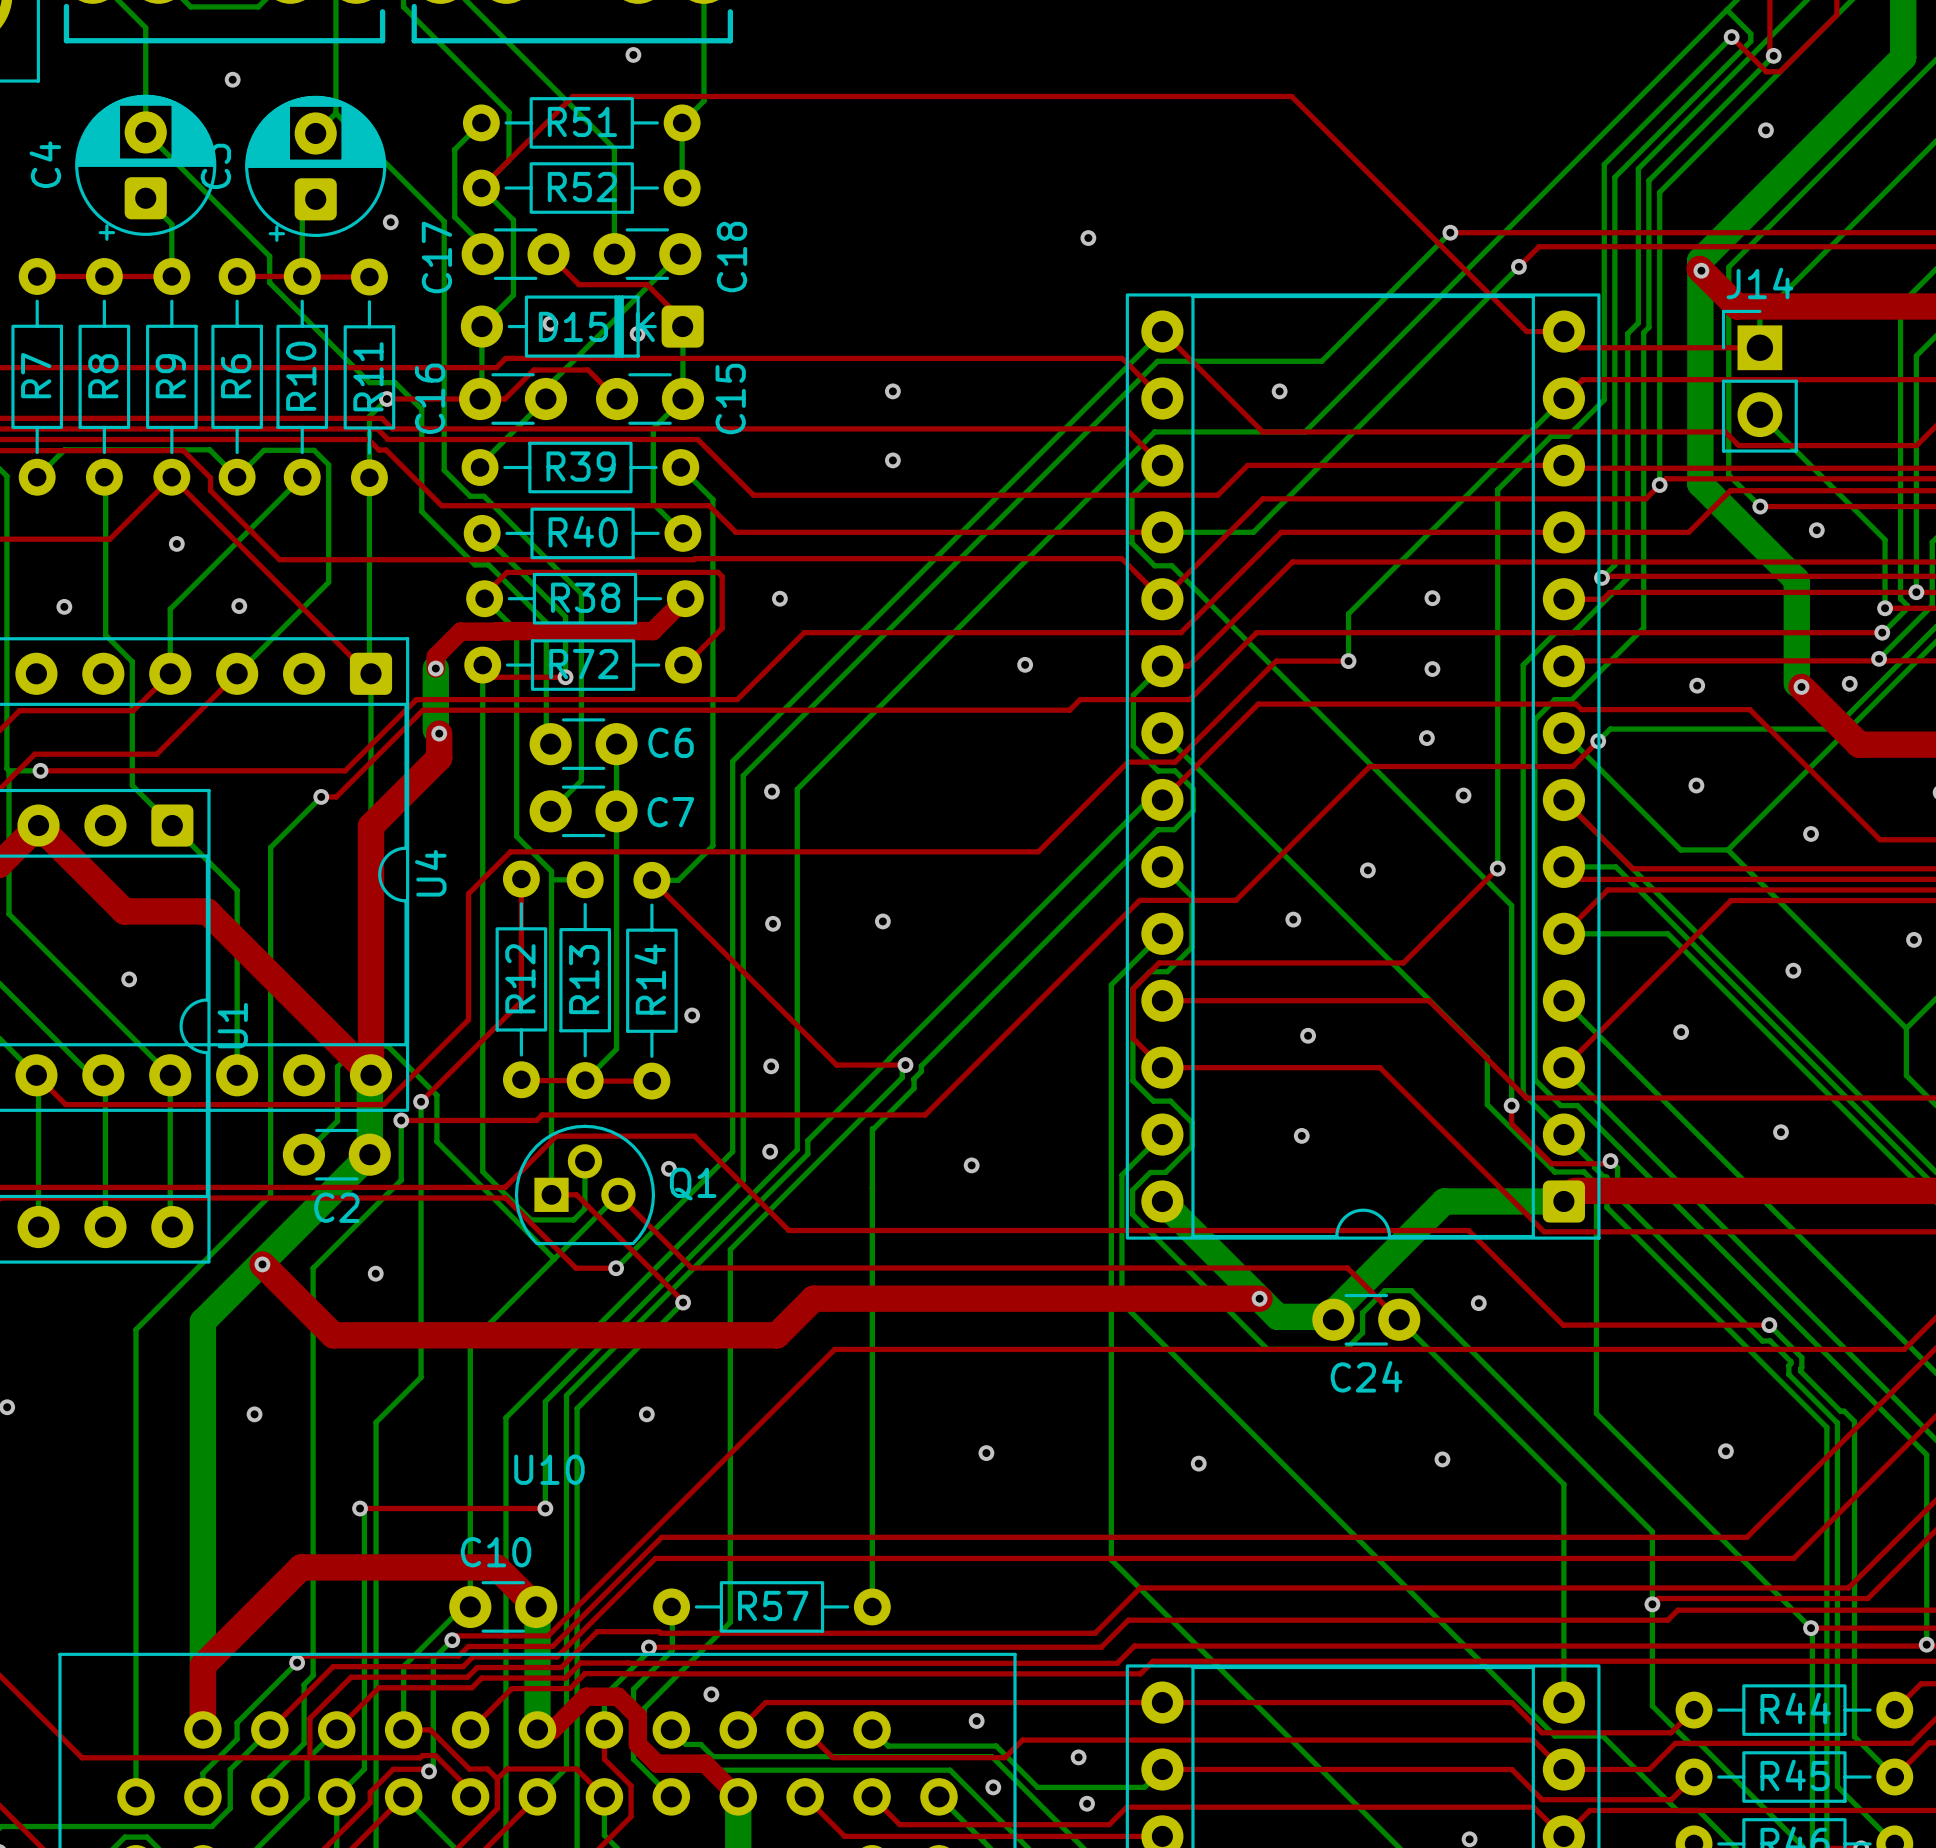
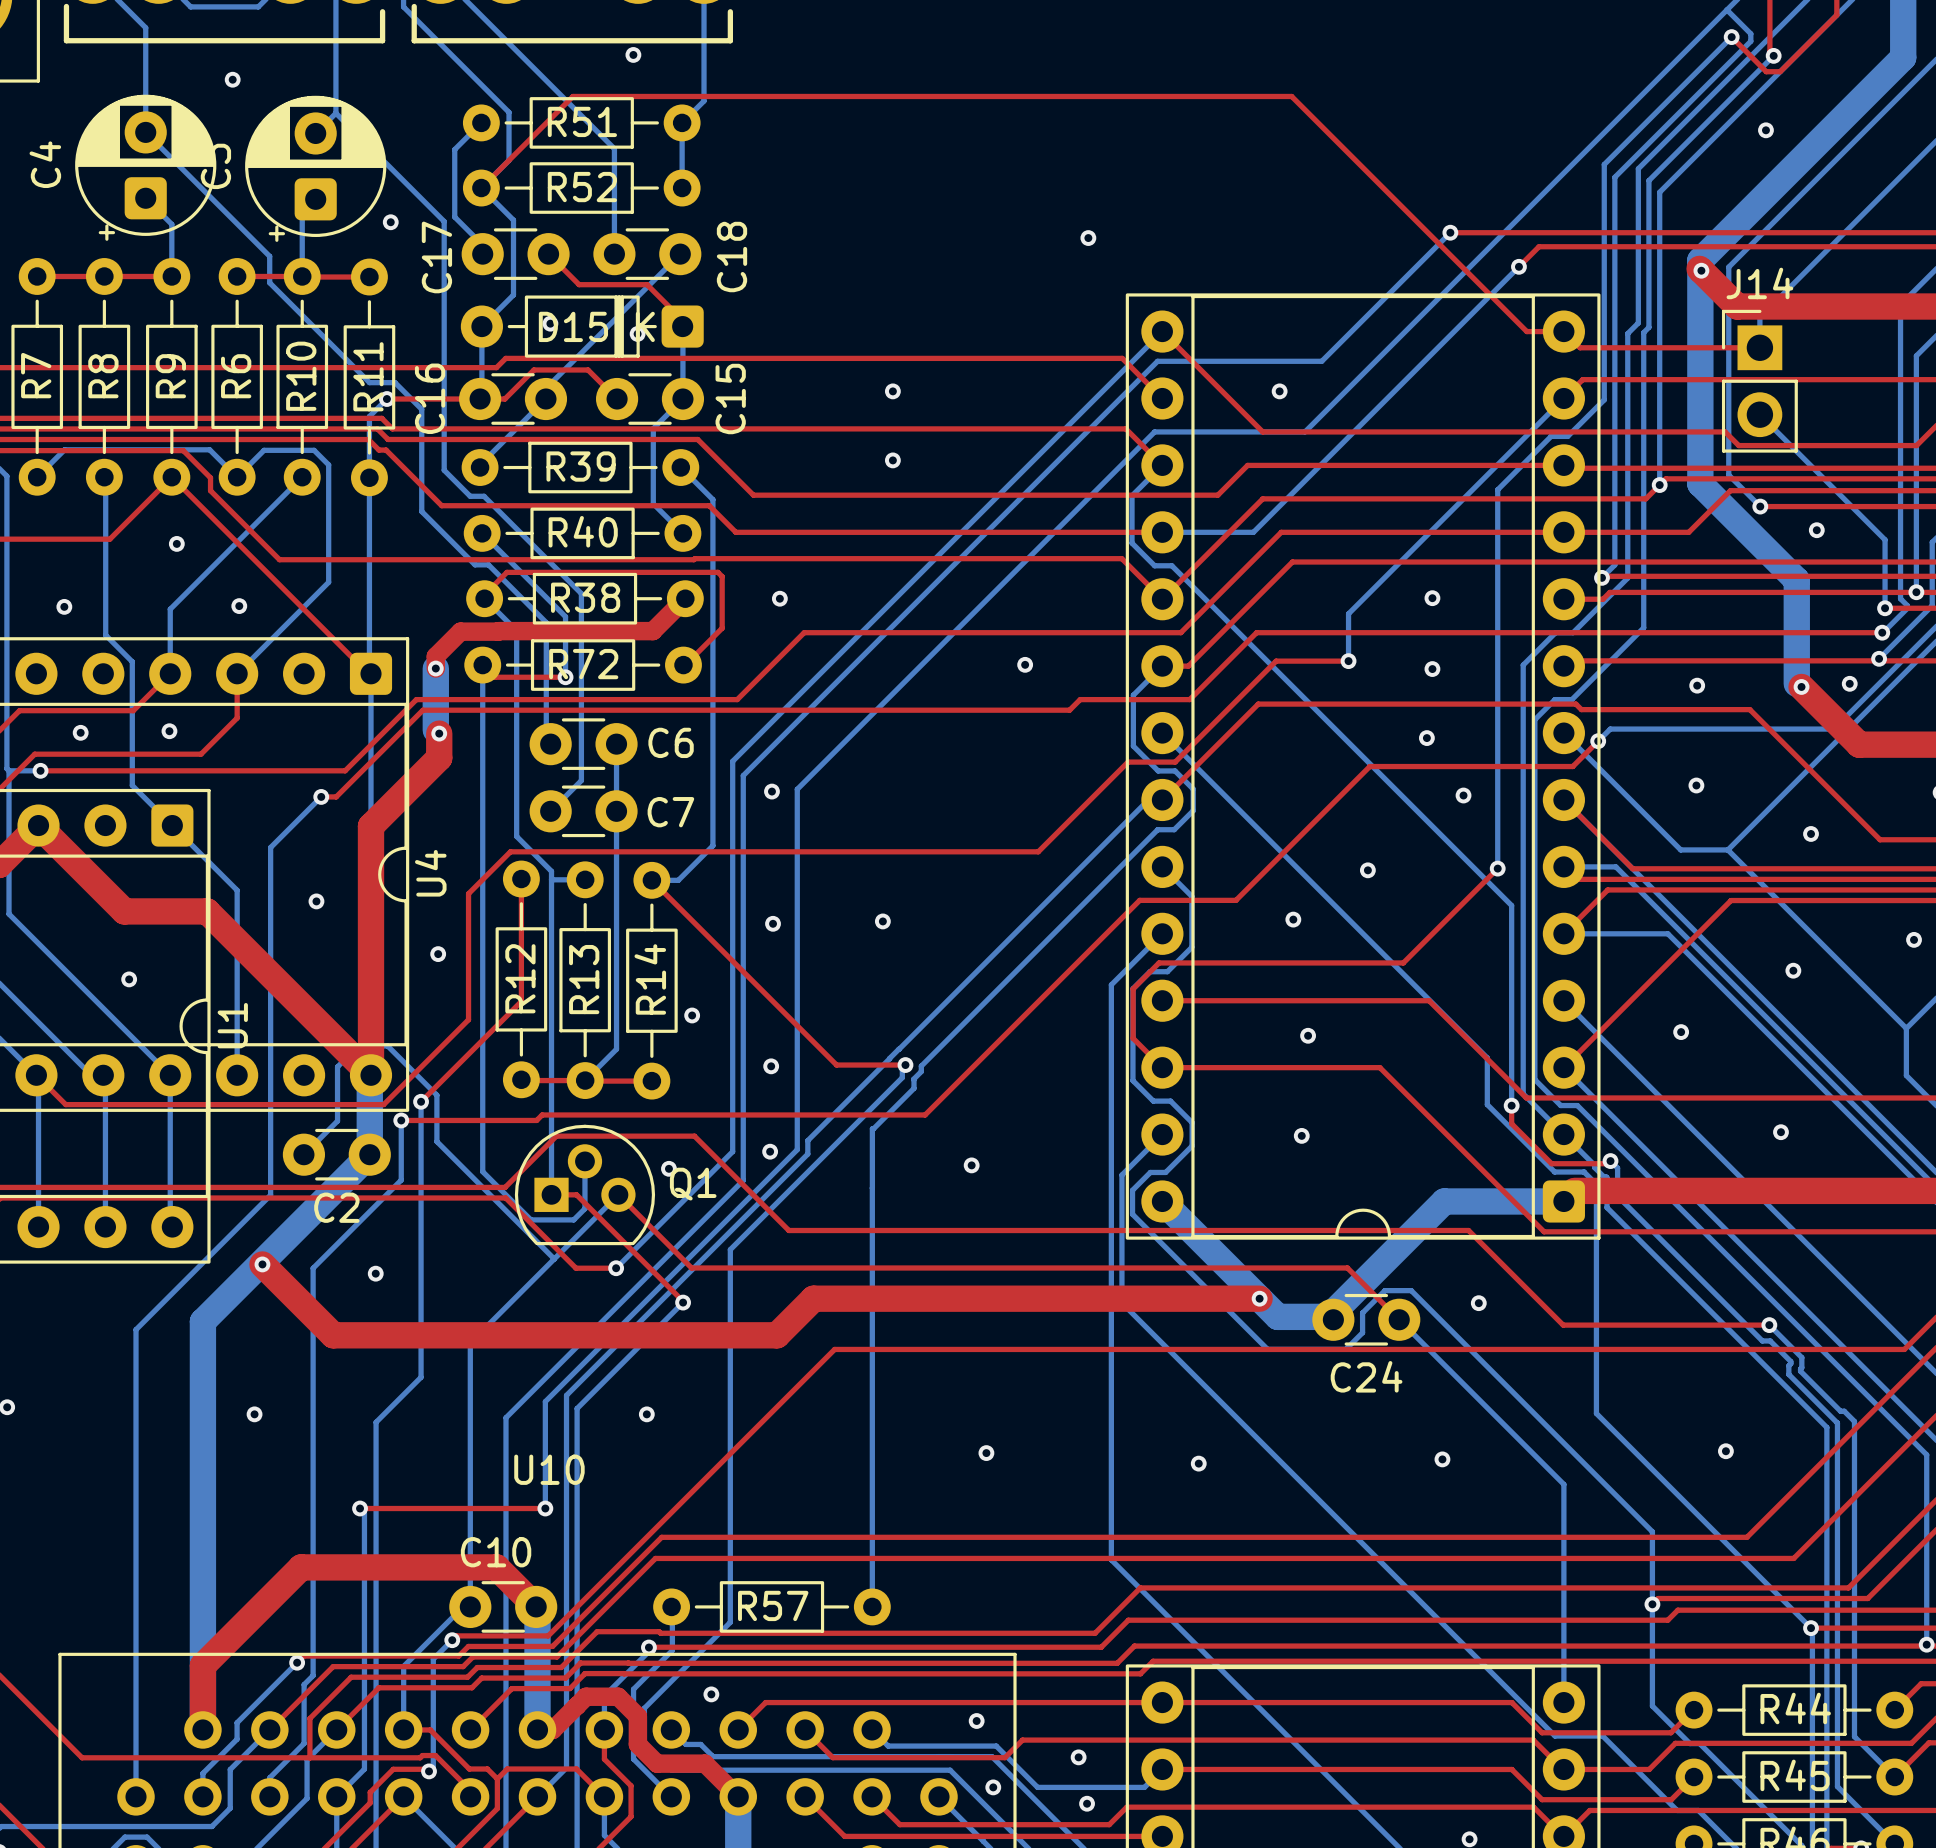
top track: (237, 673) (156, 754) -> (237, 673) (237, 718) (201, 754) (156, 754)
via: none -> (169, 731)
via: none -> (80, 732)
via: none -> (316, 901)
via: none -> (438, 954)

